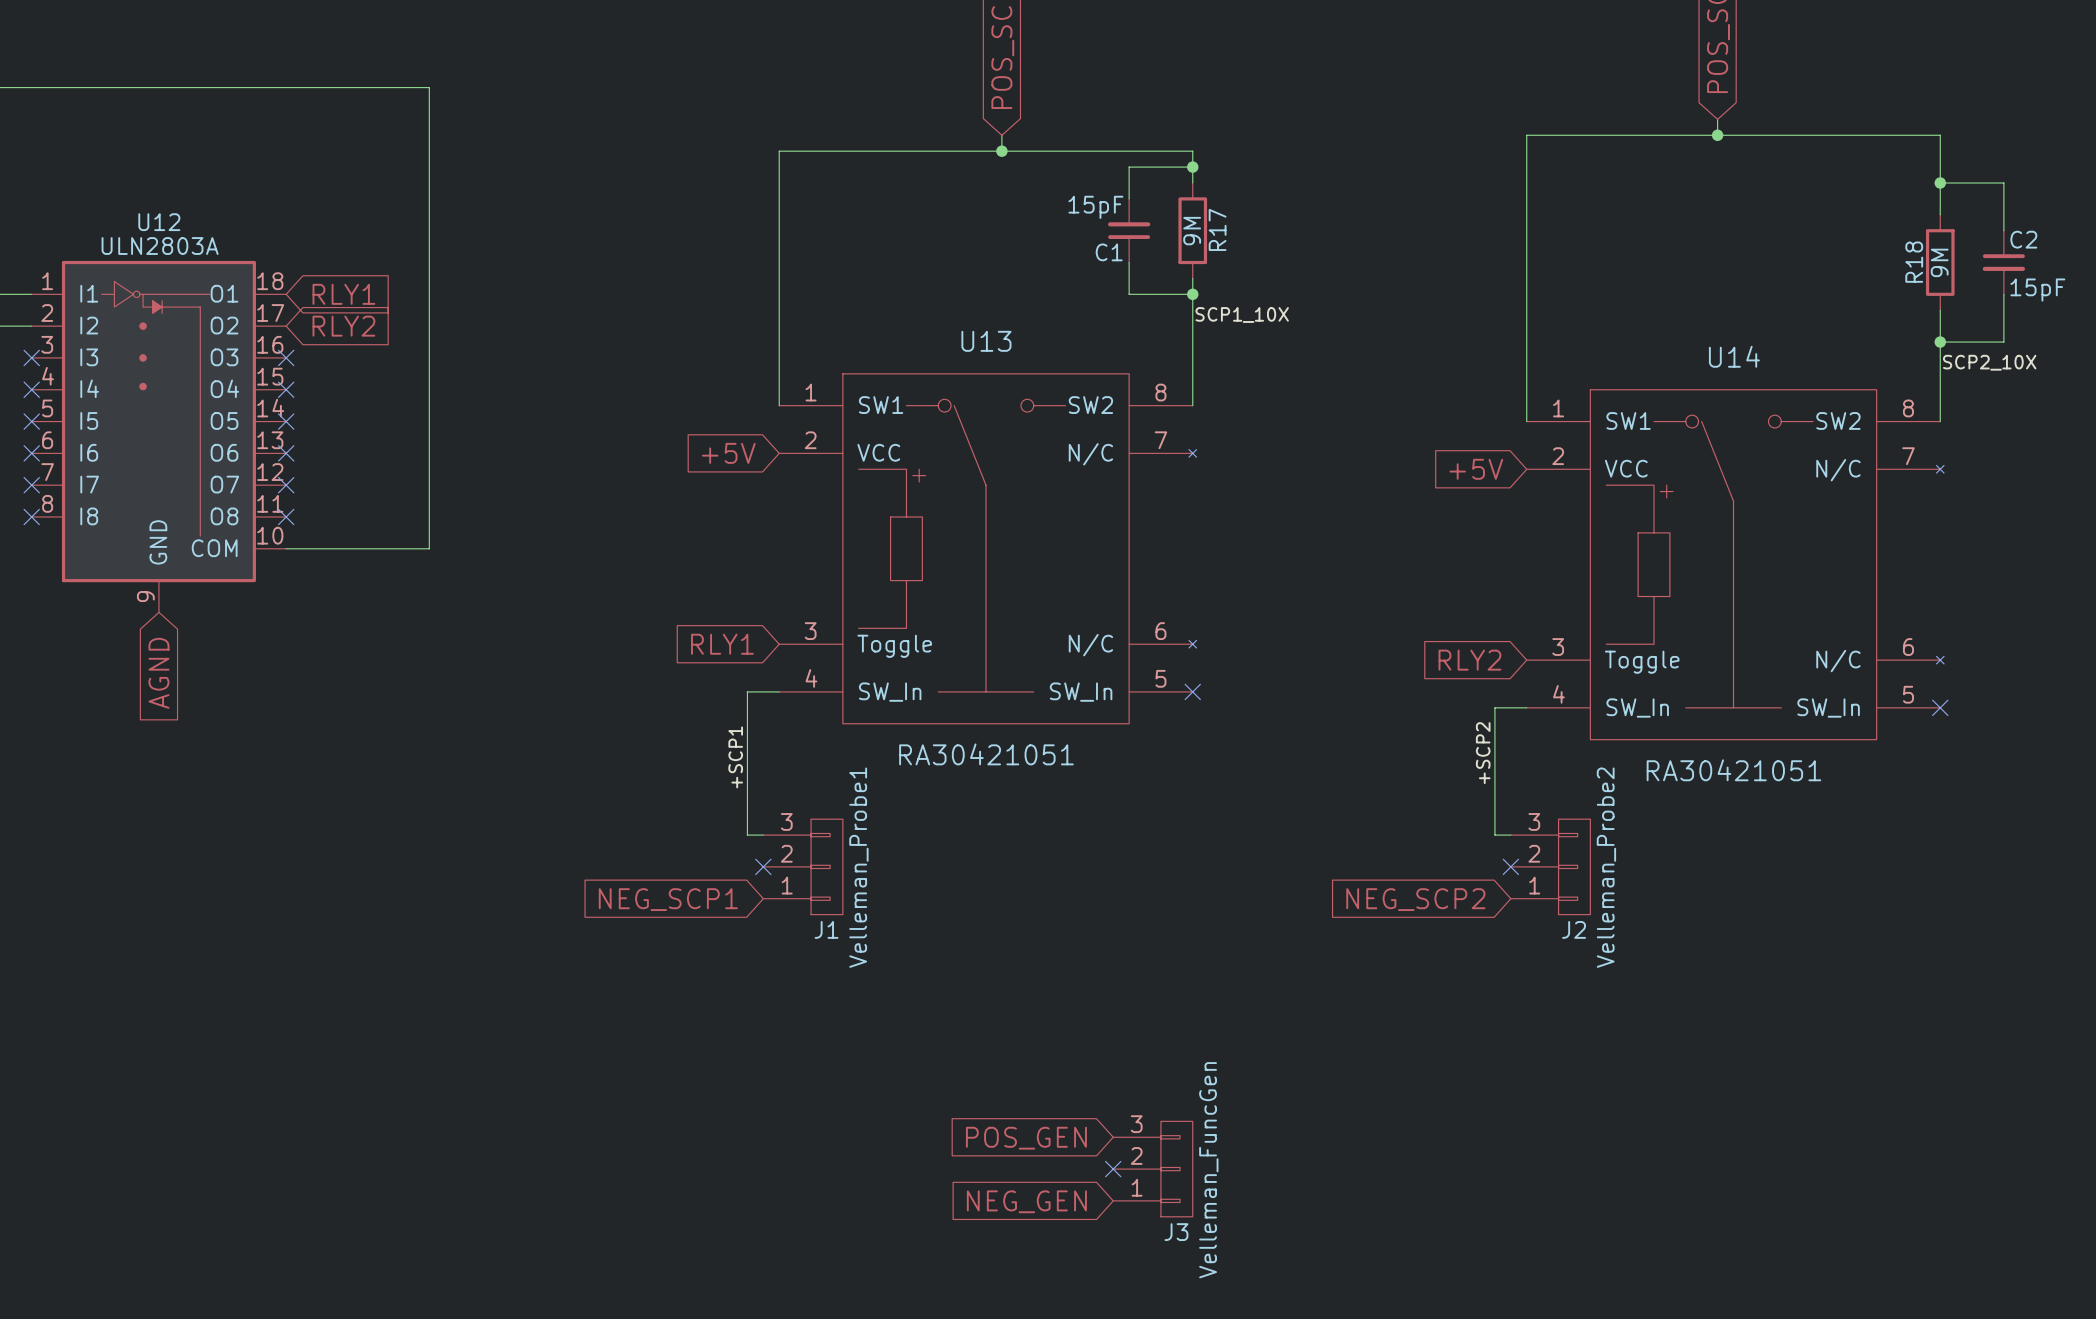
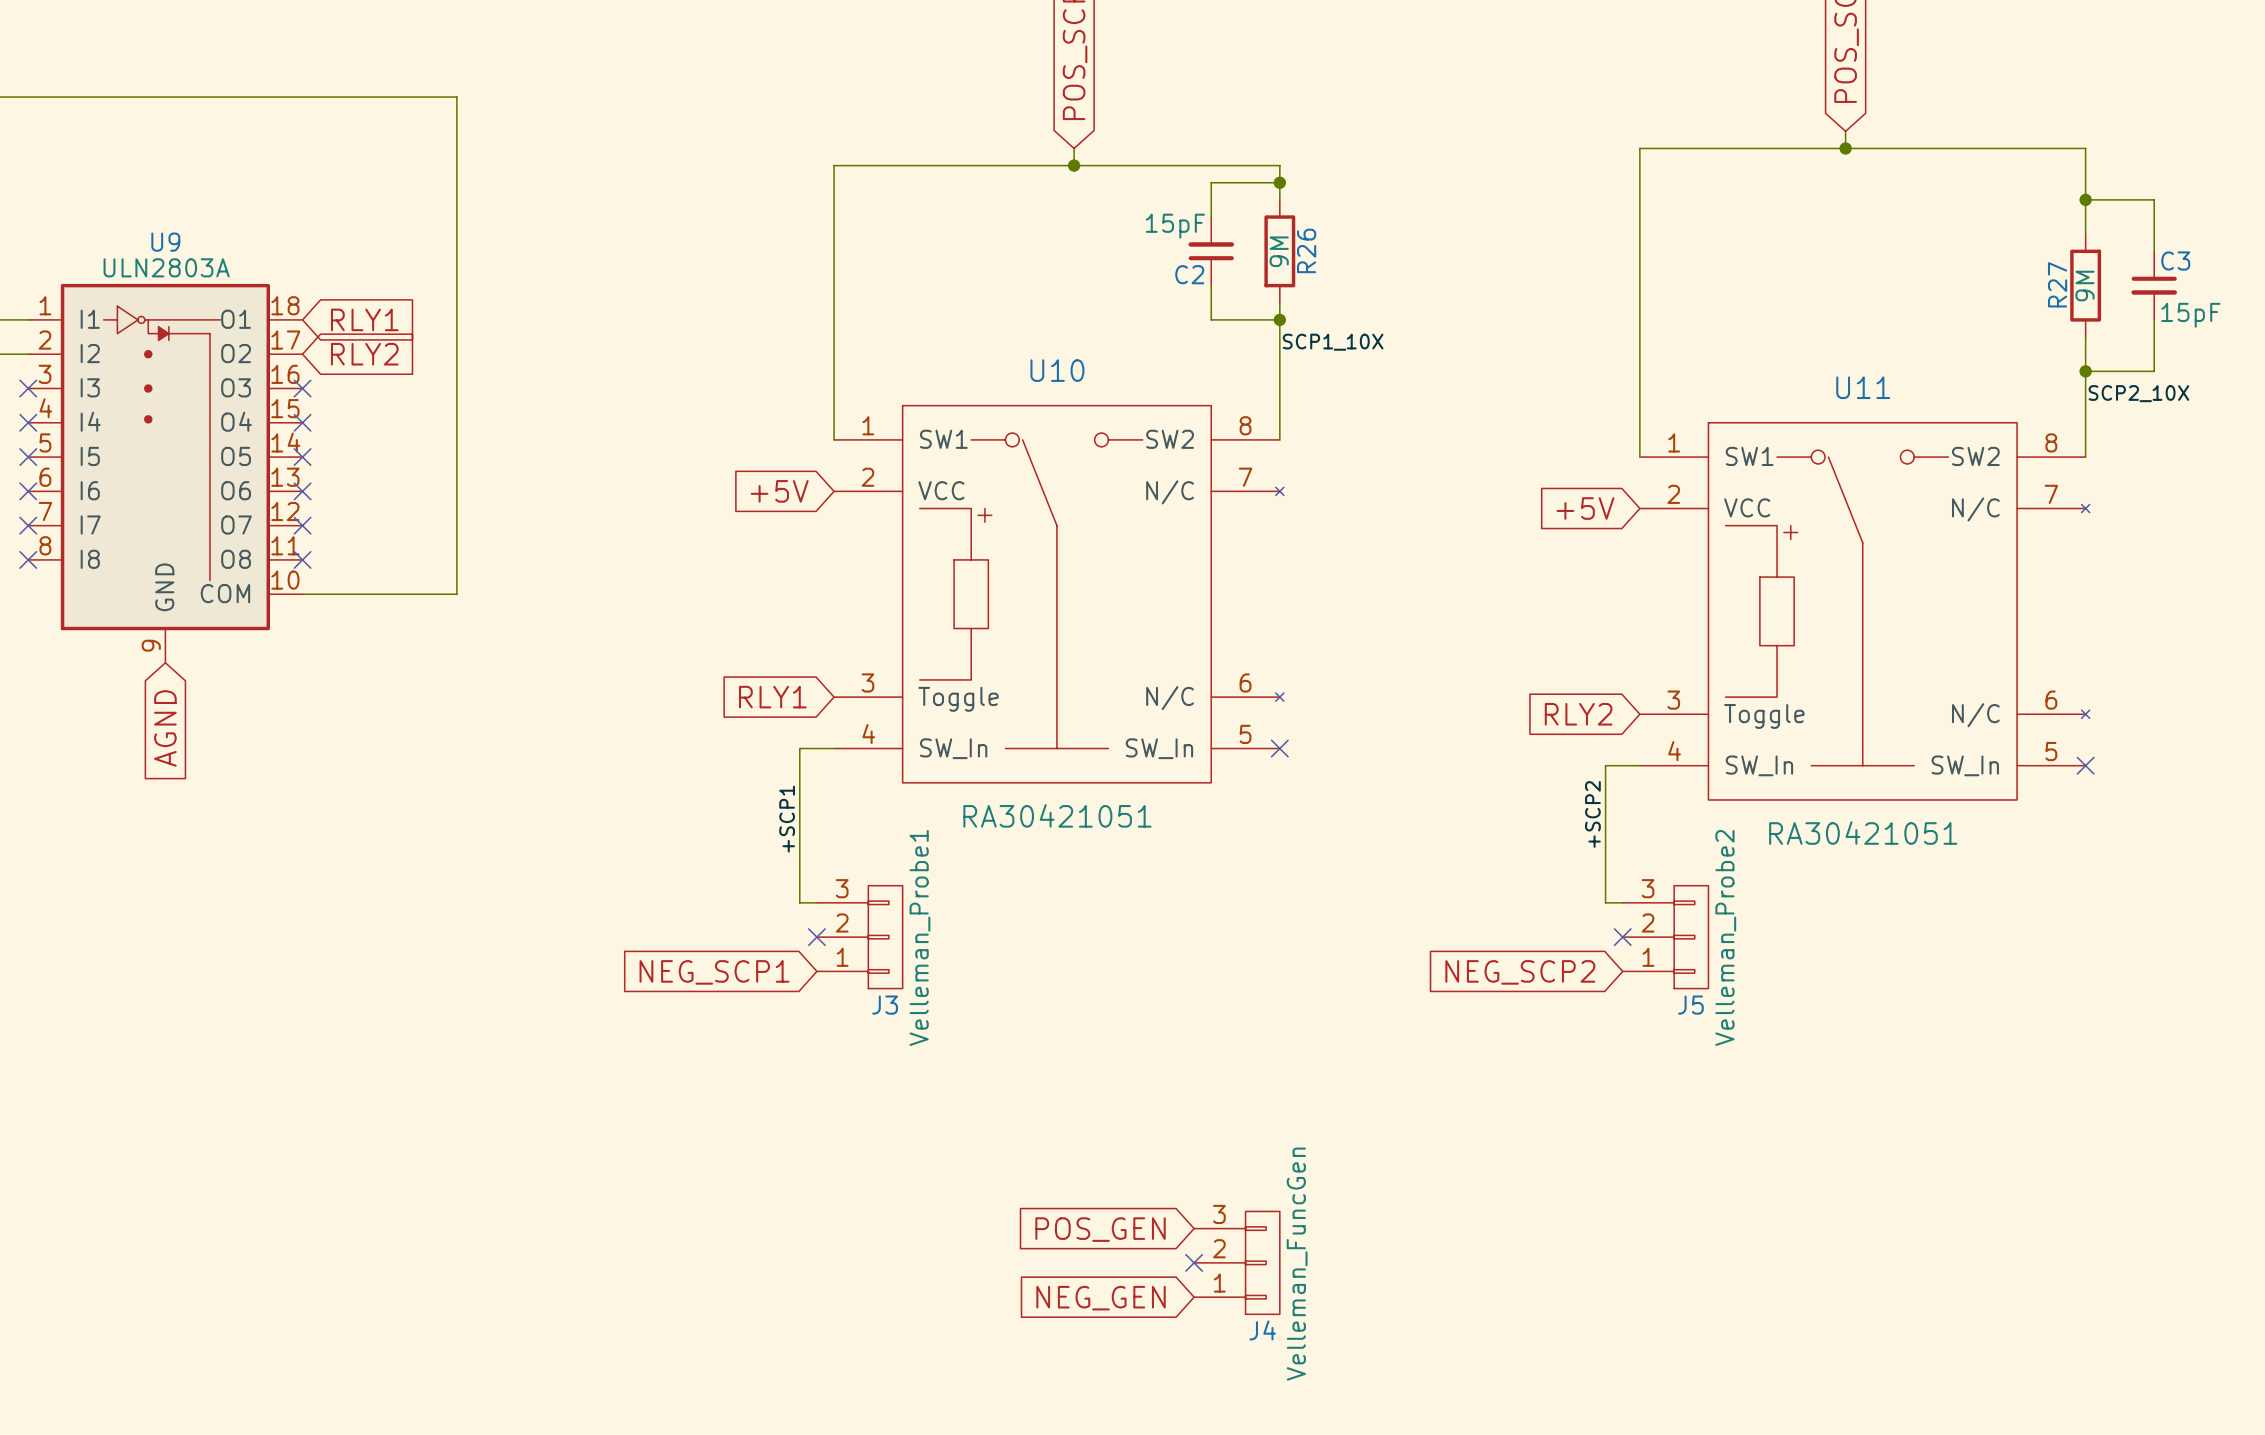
U12 name: U12 (159, 222) -> U9 (165, 242)
R17 name: R17 (1217, 229) -> R26 (1306, 250)
C2 name: C2 (2023, 239) -> C3 (2175, 260)
C1 name: C1 (1109, 252) -> C2 (1189, 274)
R18 name: R18 (1914, 262) -> R27 (2057, 284)
U13 name: U13 (986, 341) -> U10 (1057, 370)
U14 name: U14 (1734, 356) -> U11 (1863, 387)
J1 name: J1 (826, 929) -> J3 (885, 1005)
J2 name: J2 (1574, 929) -> J5 (1690, 1005)
J3 name: J3 (1176, 1232) -> J4 (1262, 1330)

